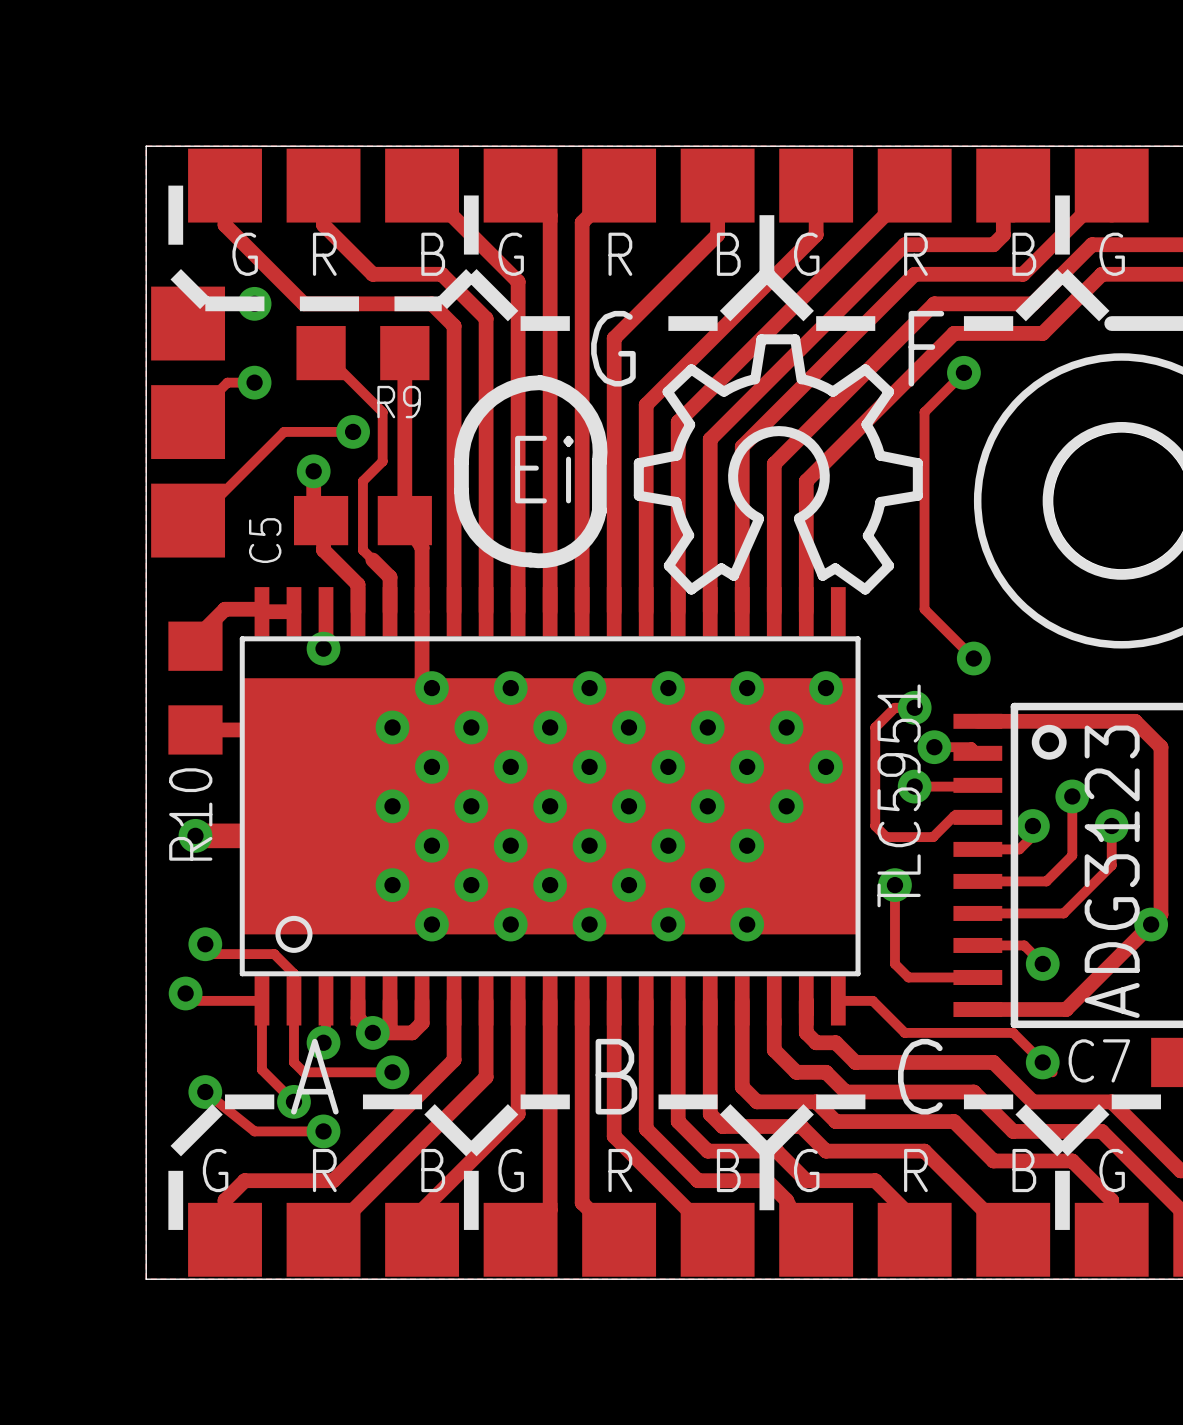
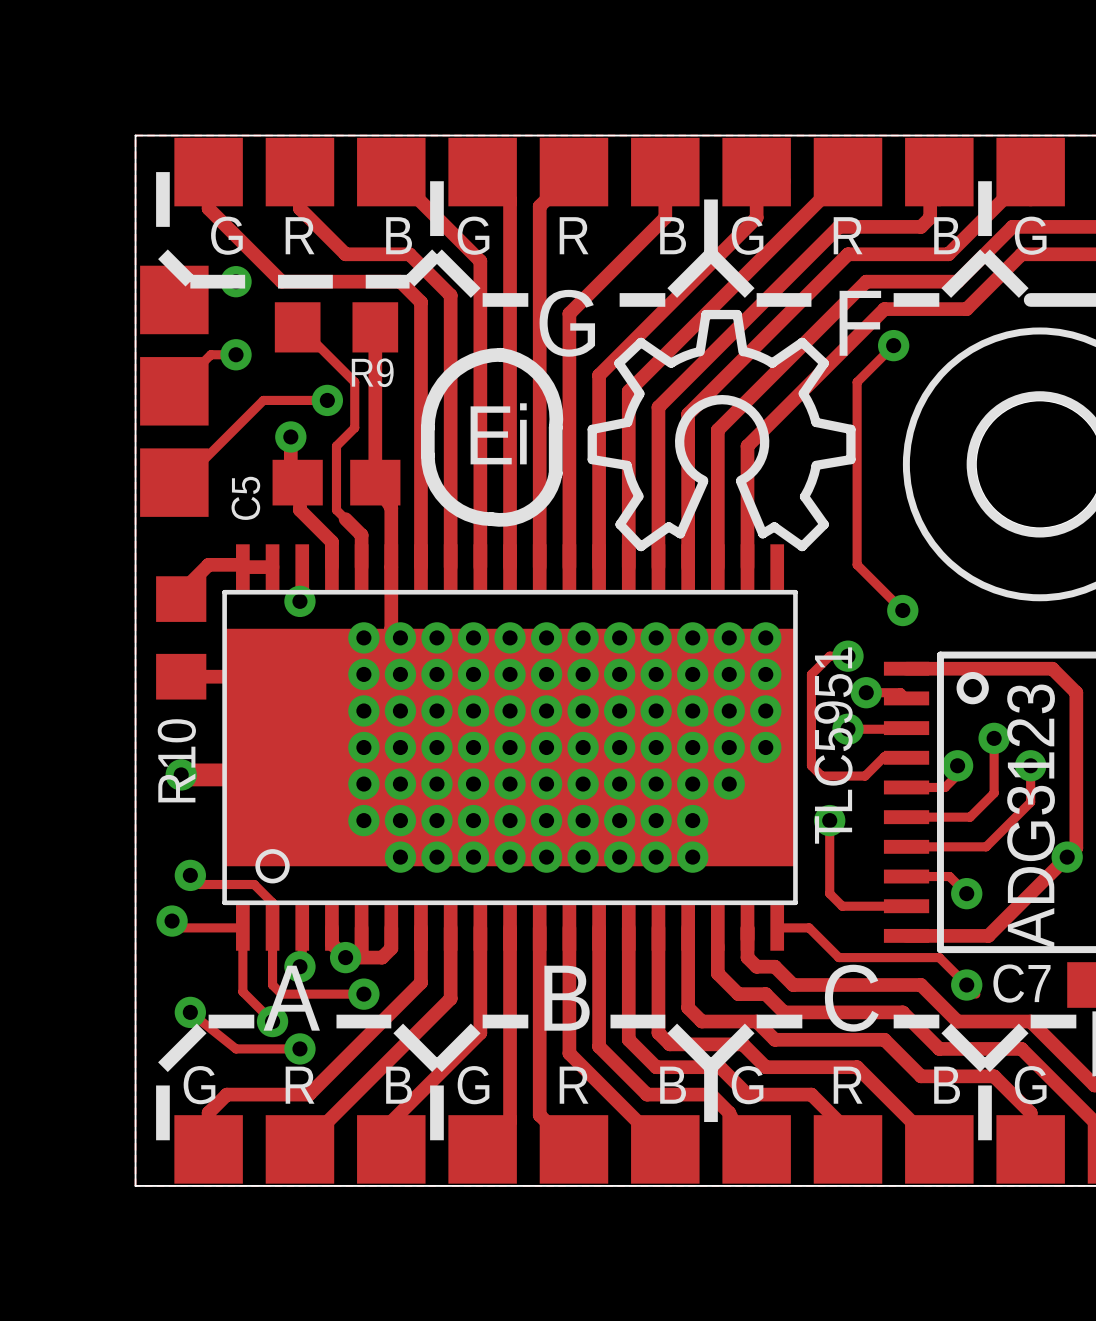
via: none -> (363, 637)
via: none -> (436, 637)
via: none -> (510, 637)
via: none -> (583, 637)
via: none -> (656, 637)
via: none -> (729, 637)
via: none -> (400, 674)
via: none -> (473, 674)
via: none -> (546, 674)
via: none -> (619, 674)
via: none -> (692, 674)
via: none -> (765, 674)
via: none -> (363, 710)
via: none -> (436, 710)
via: none -> (510, 710)
via: none -> (583, 710)
via: none -> (656, 710)
via: none -> (729, 710)
via: none -> (400, 747)
via: none -> (473, 747)
via: none -> (546, 747)
via: none -> (619, 747)
via: none -> (692, 747)
via: none -> (765, 747)
via: none -> (363, 784)
via: none -> (436, 784)
via: none -> (510, 784)
via: none -> (583, 784)
via: none -> (656, 784)
via: none -> (729, 784)
via: none -> (400, 820)
via: none -> (473, 820)
via: none -> (546, 820)
via: none -> (619, 820)
via: none -> (692, 820)
via: none -> (436, 857)
via: none -> (510, 857)
via: none -> (583, 857)
via: none -> (656, 857)

